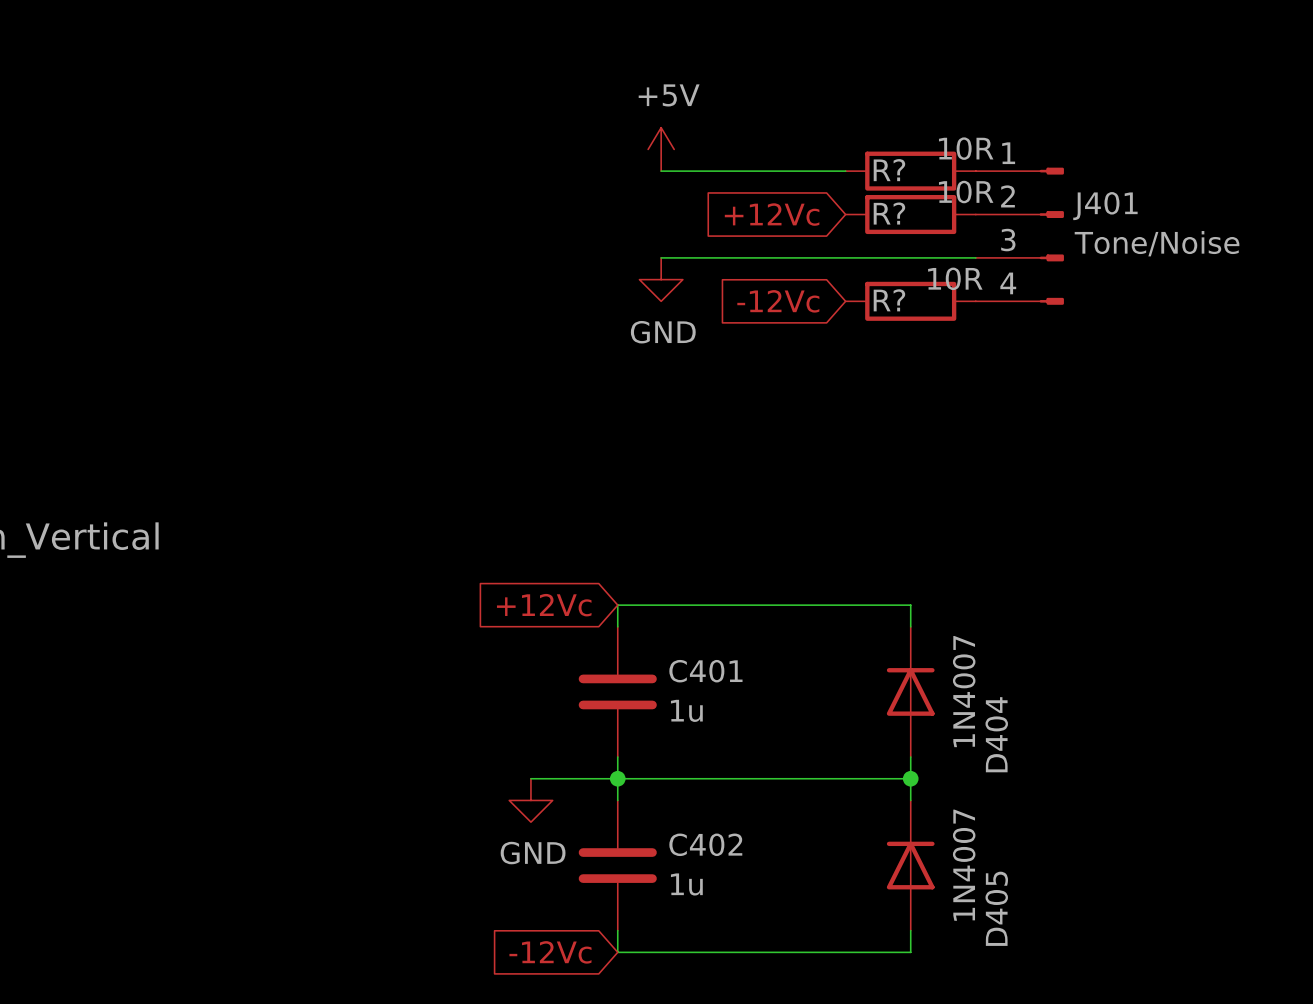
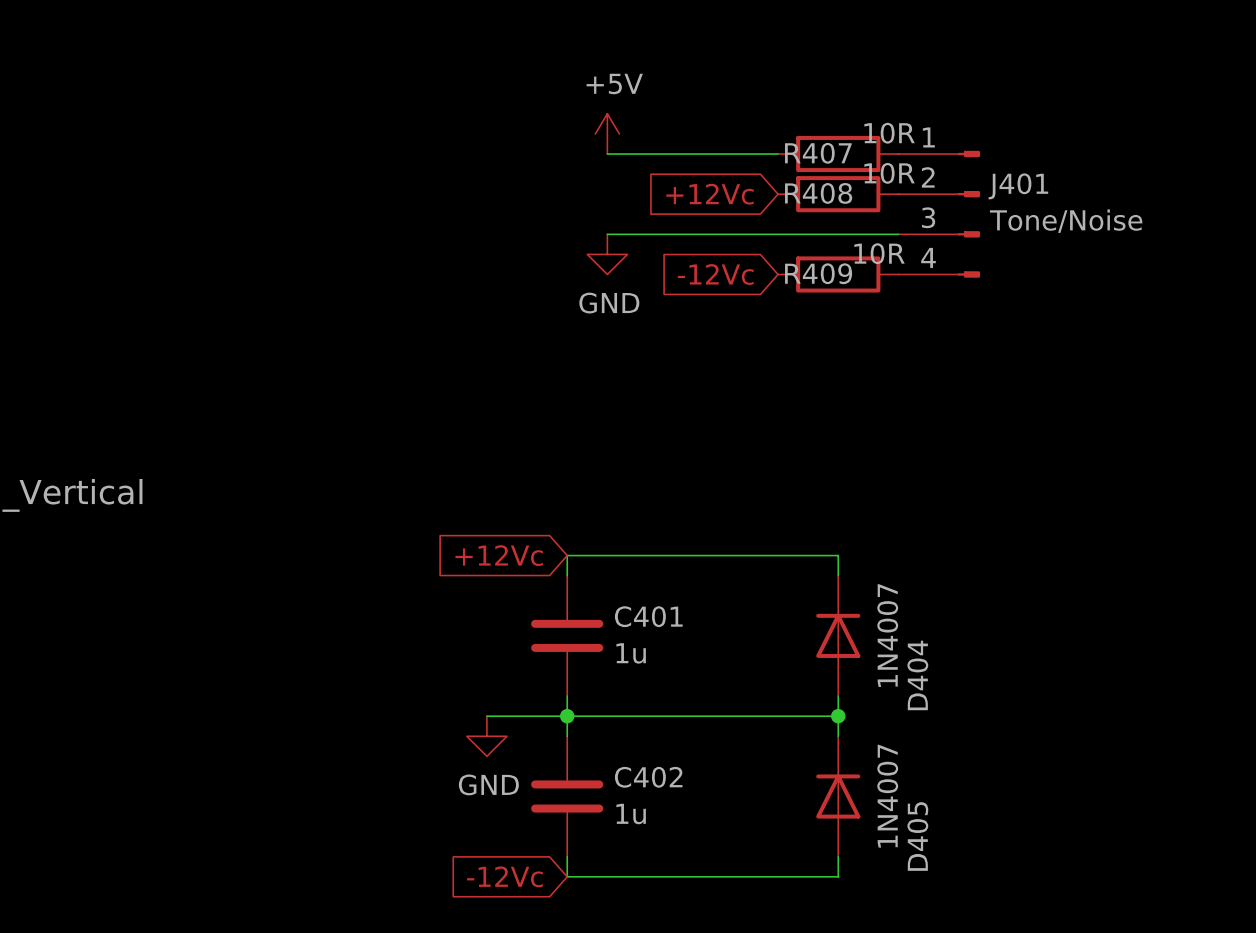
R? name: R? (889, 170) -> R407 (818, 153)
R? name: R? (889, 213) -> R408 (818, 193)
R? name: R? (889, 300) -> R409 (818, 273)

